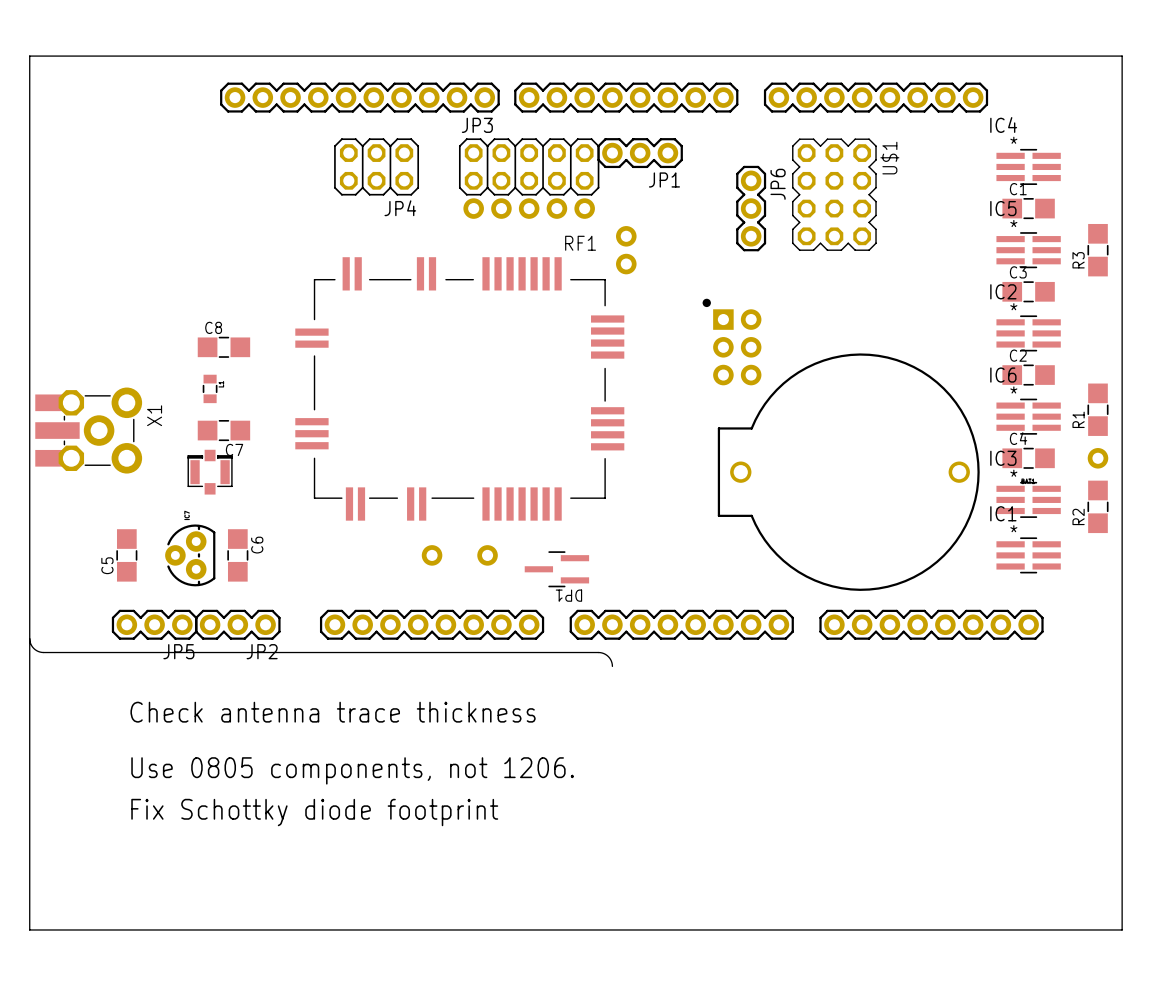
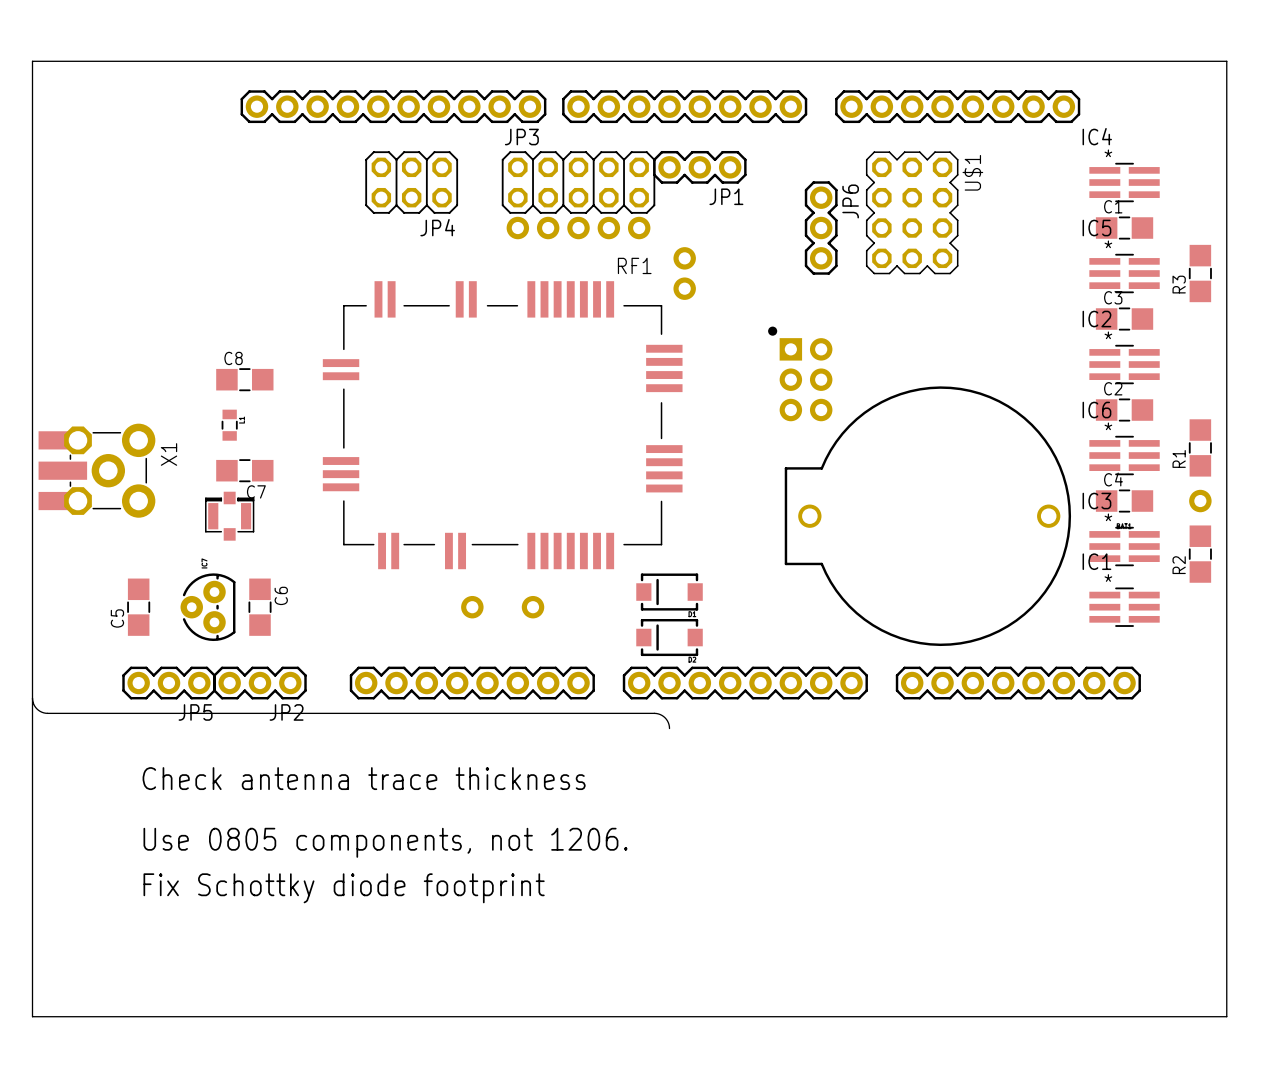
part: none -> (669, 592)
DP1: (556, 569) -> none
part: none -> (669, 637)

